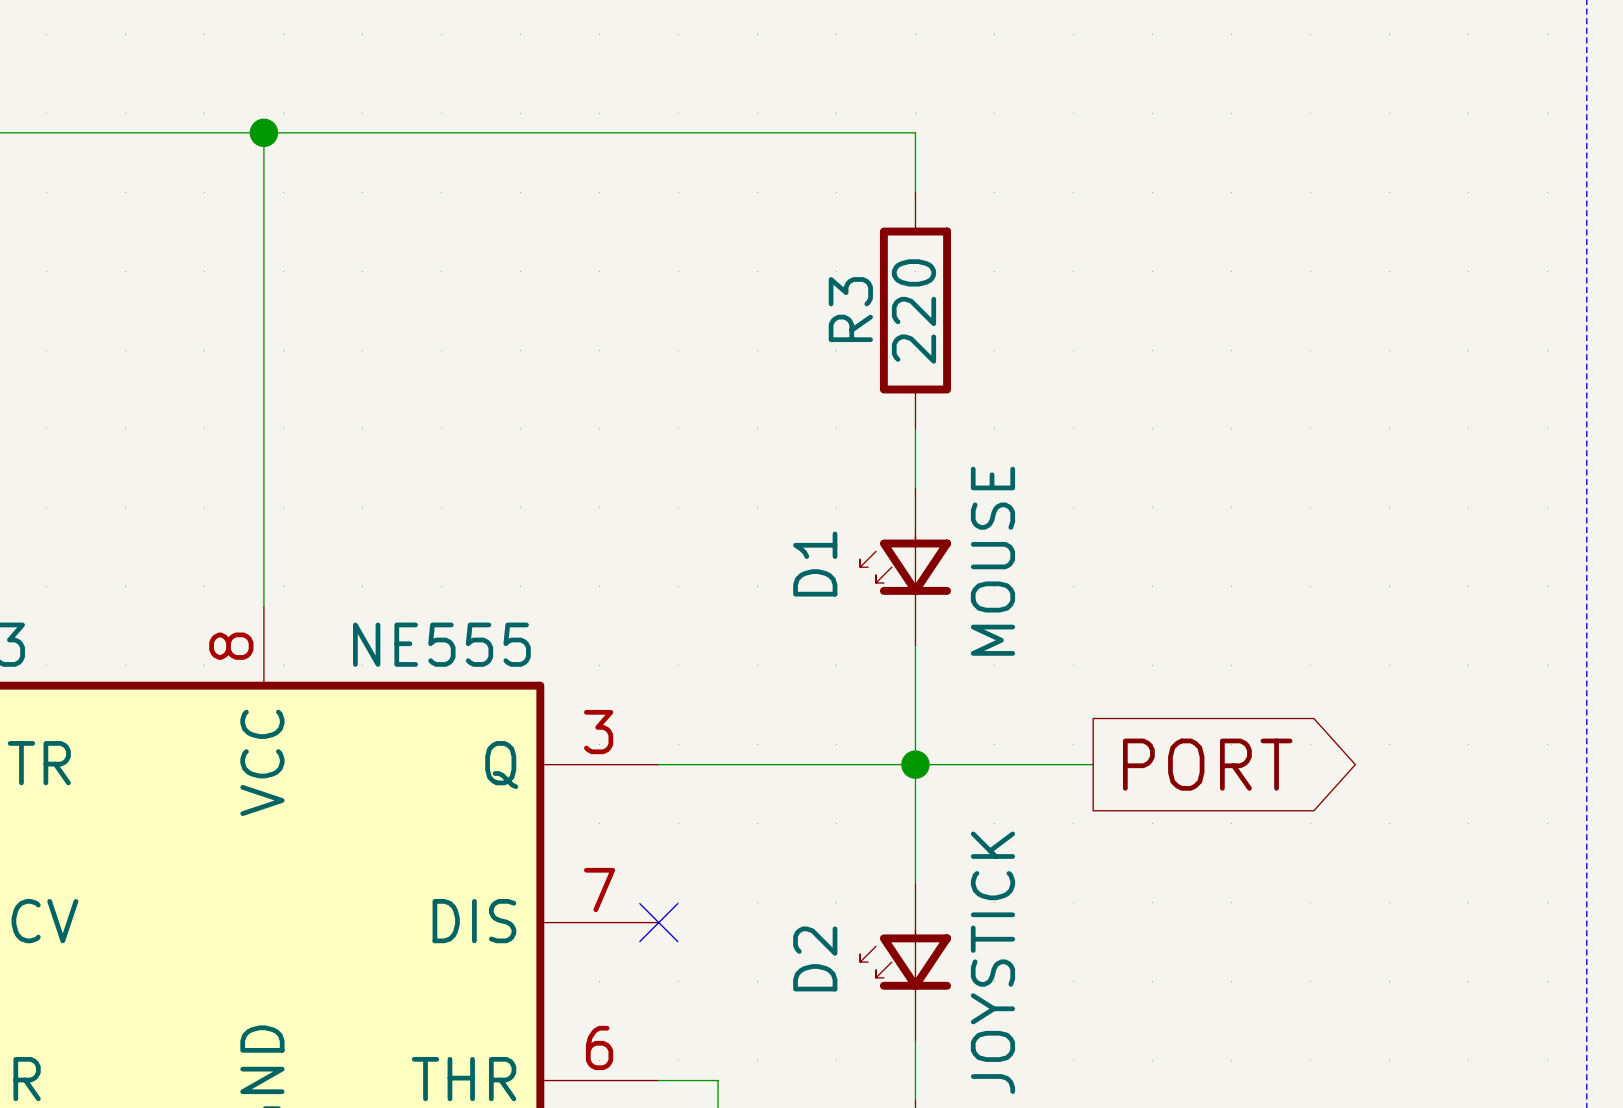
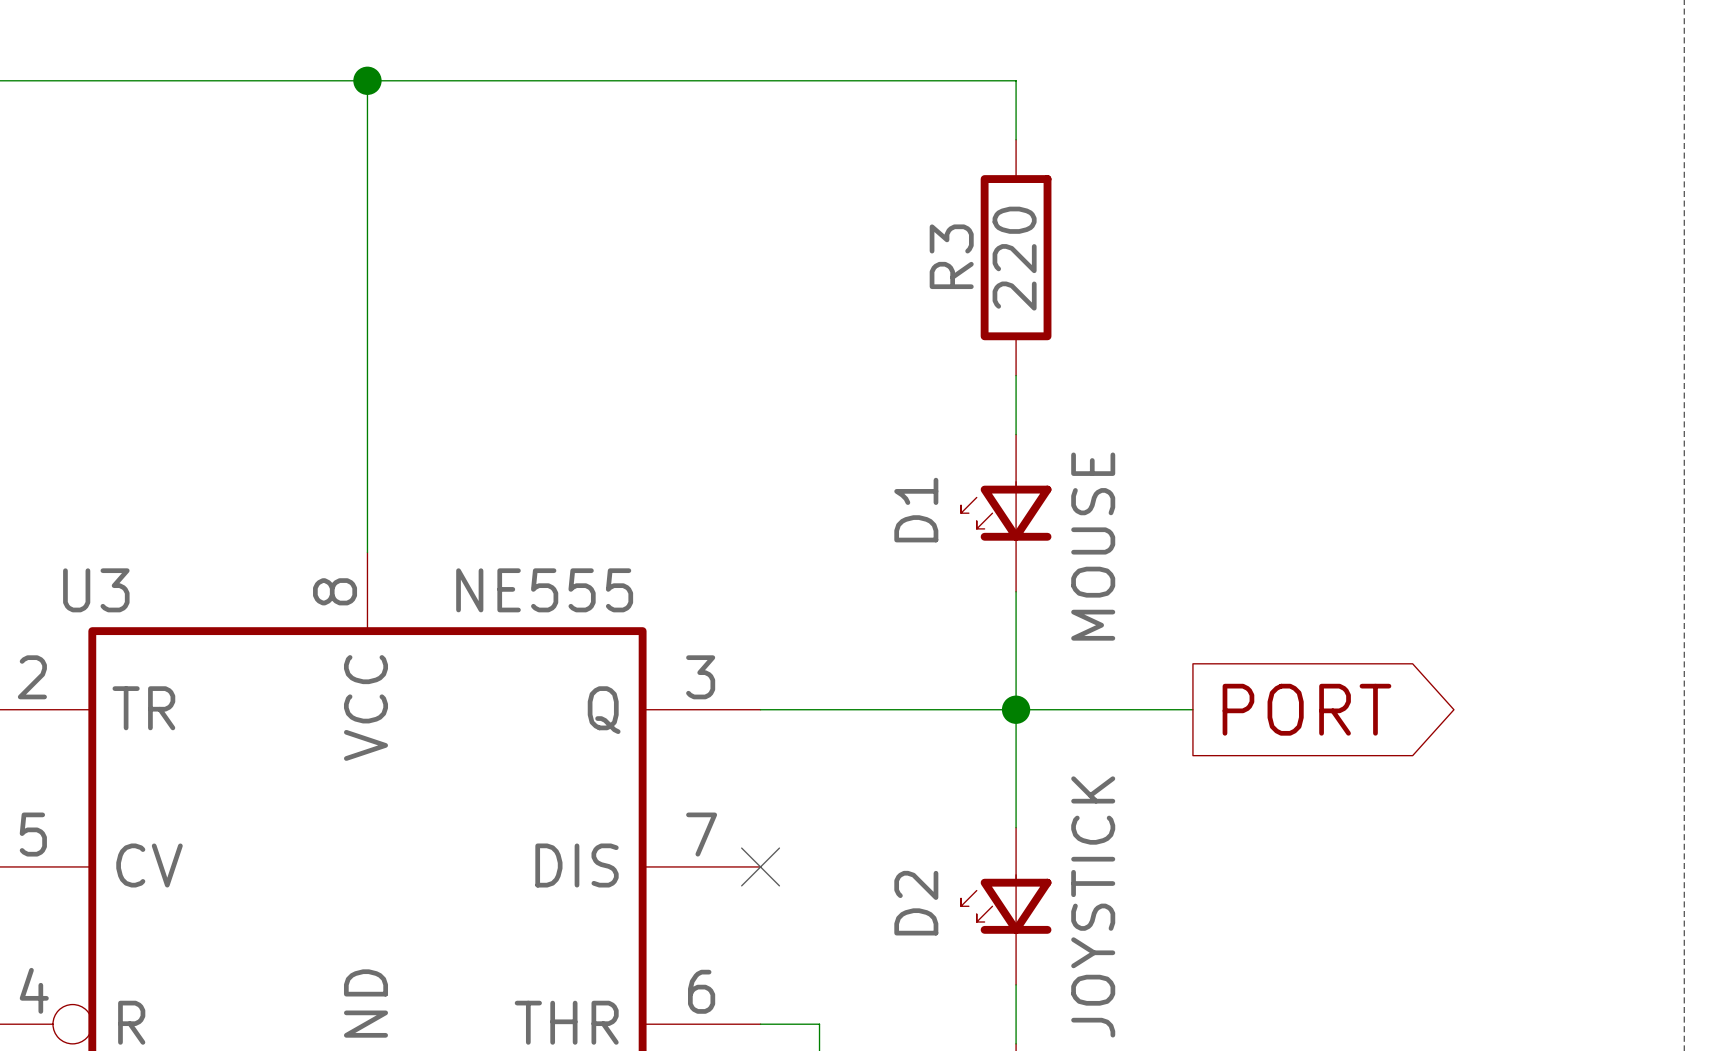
D1 value position: MOUSE (992, 561) -> MOUSE (1093, 546)

